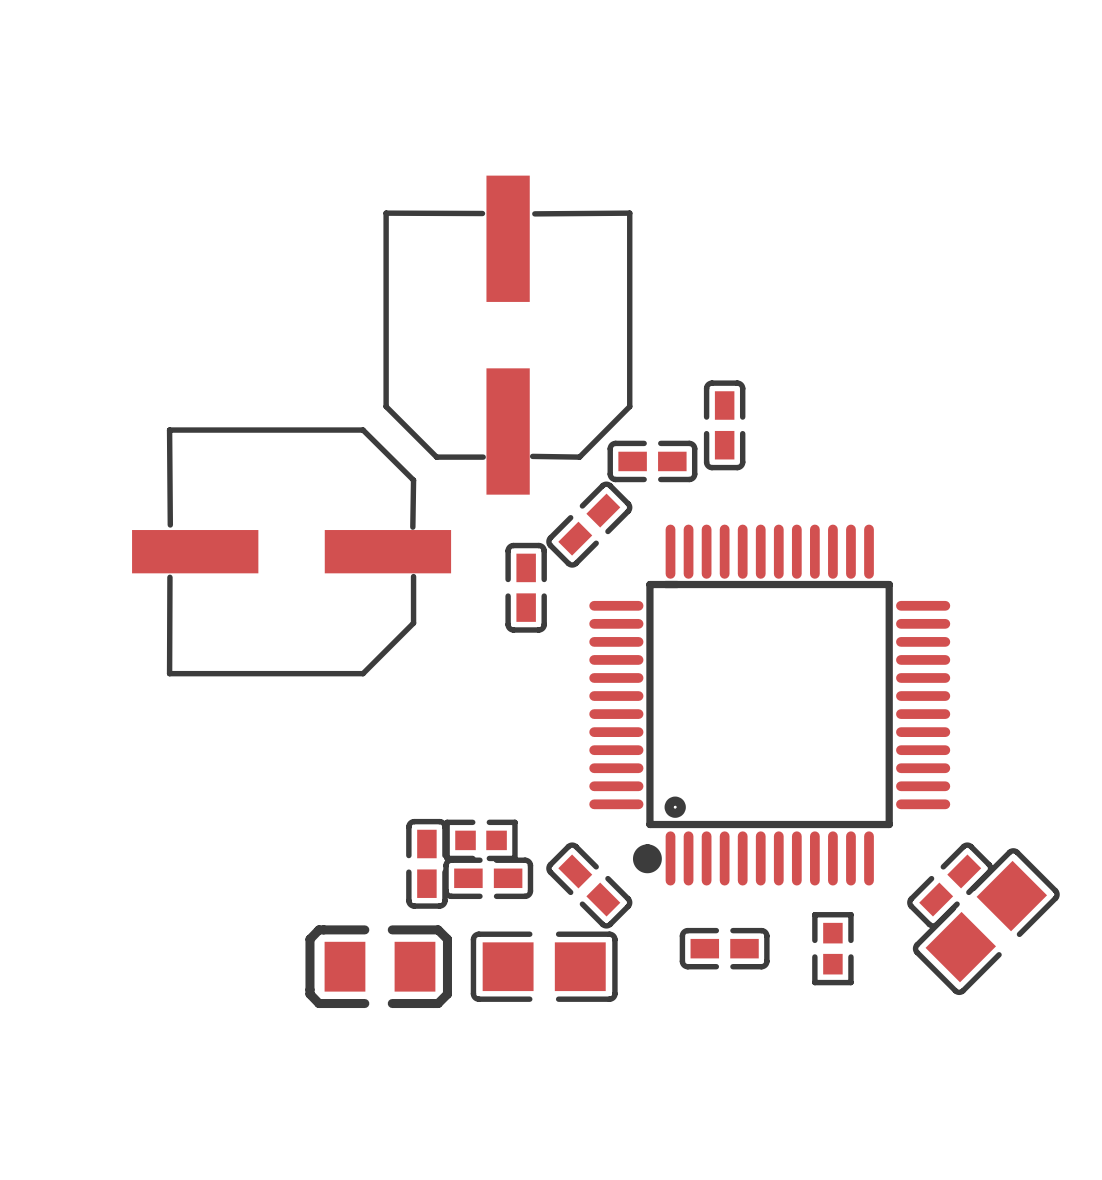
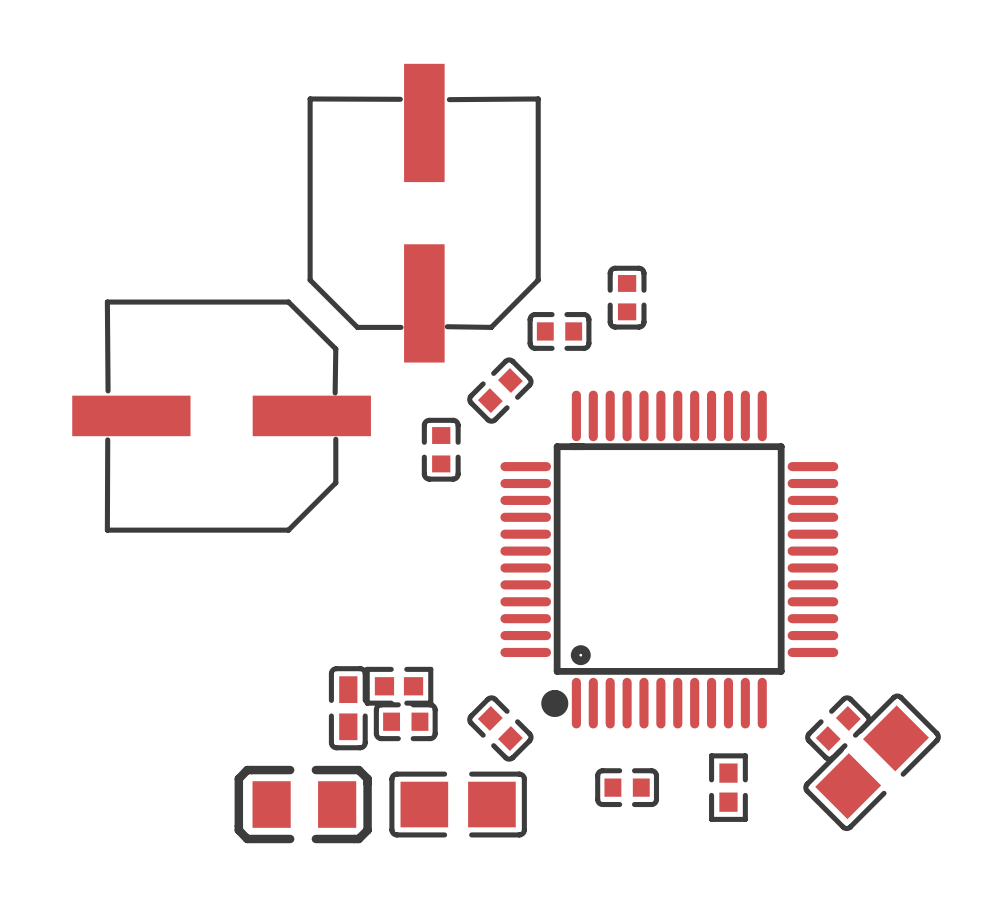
part footprint: [703, 380, 746, 471] -> [607, 265, 647, 330]
part footprint: [607, 440, 698, 483] -> [527, 312, 592, 351]
part footprint: [546, 481, 633, 568] -> [467, 357, 534, 424]
part footprint: [505, 542, 547, 633] -> [421, 417, 461, 482]
part footprint: [546, 842, 633, 929] -> [467, 695, 534, 762]
part footprint: [907, 842, 994, 929] -> [805, 695, 872, 762]
part footprint: [443, 857, 534, 900] -> [373, 702, 438, 742]
part footprint: [679, 927, 770, 970] -> [595, 768, 660, 808]

